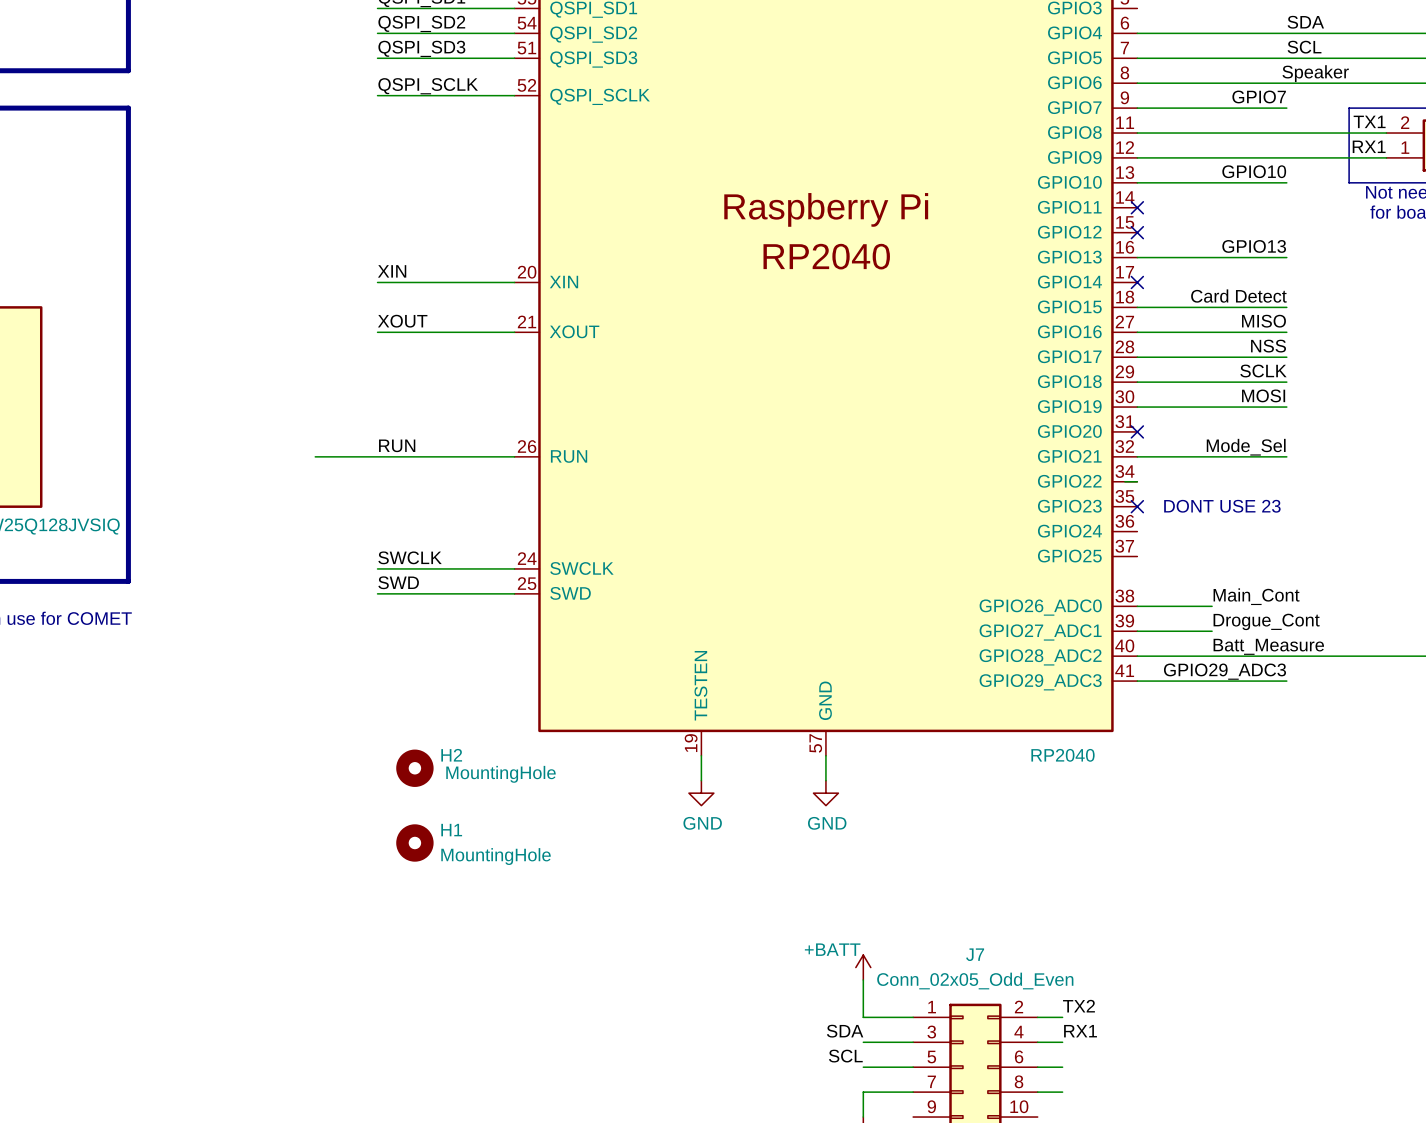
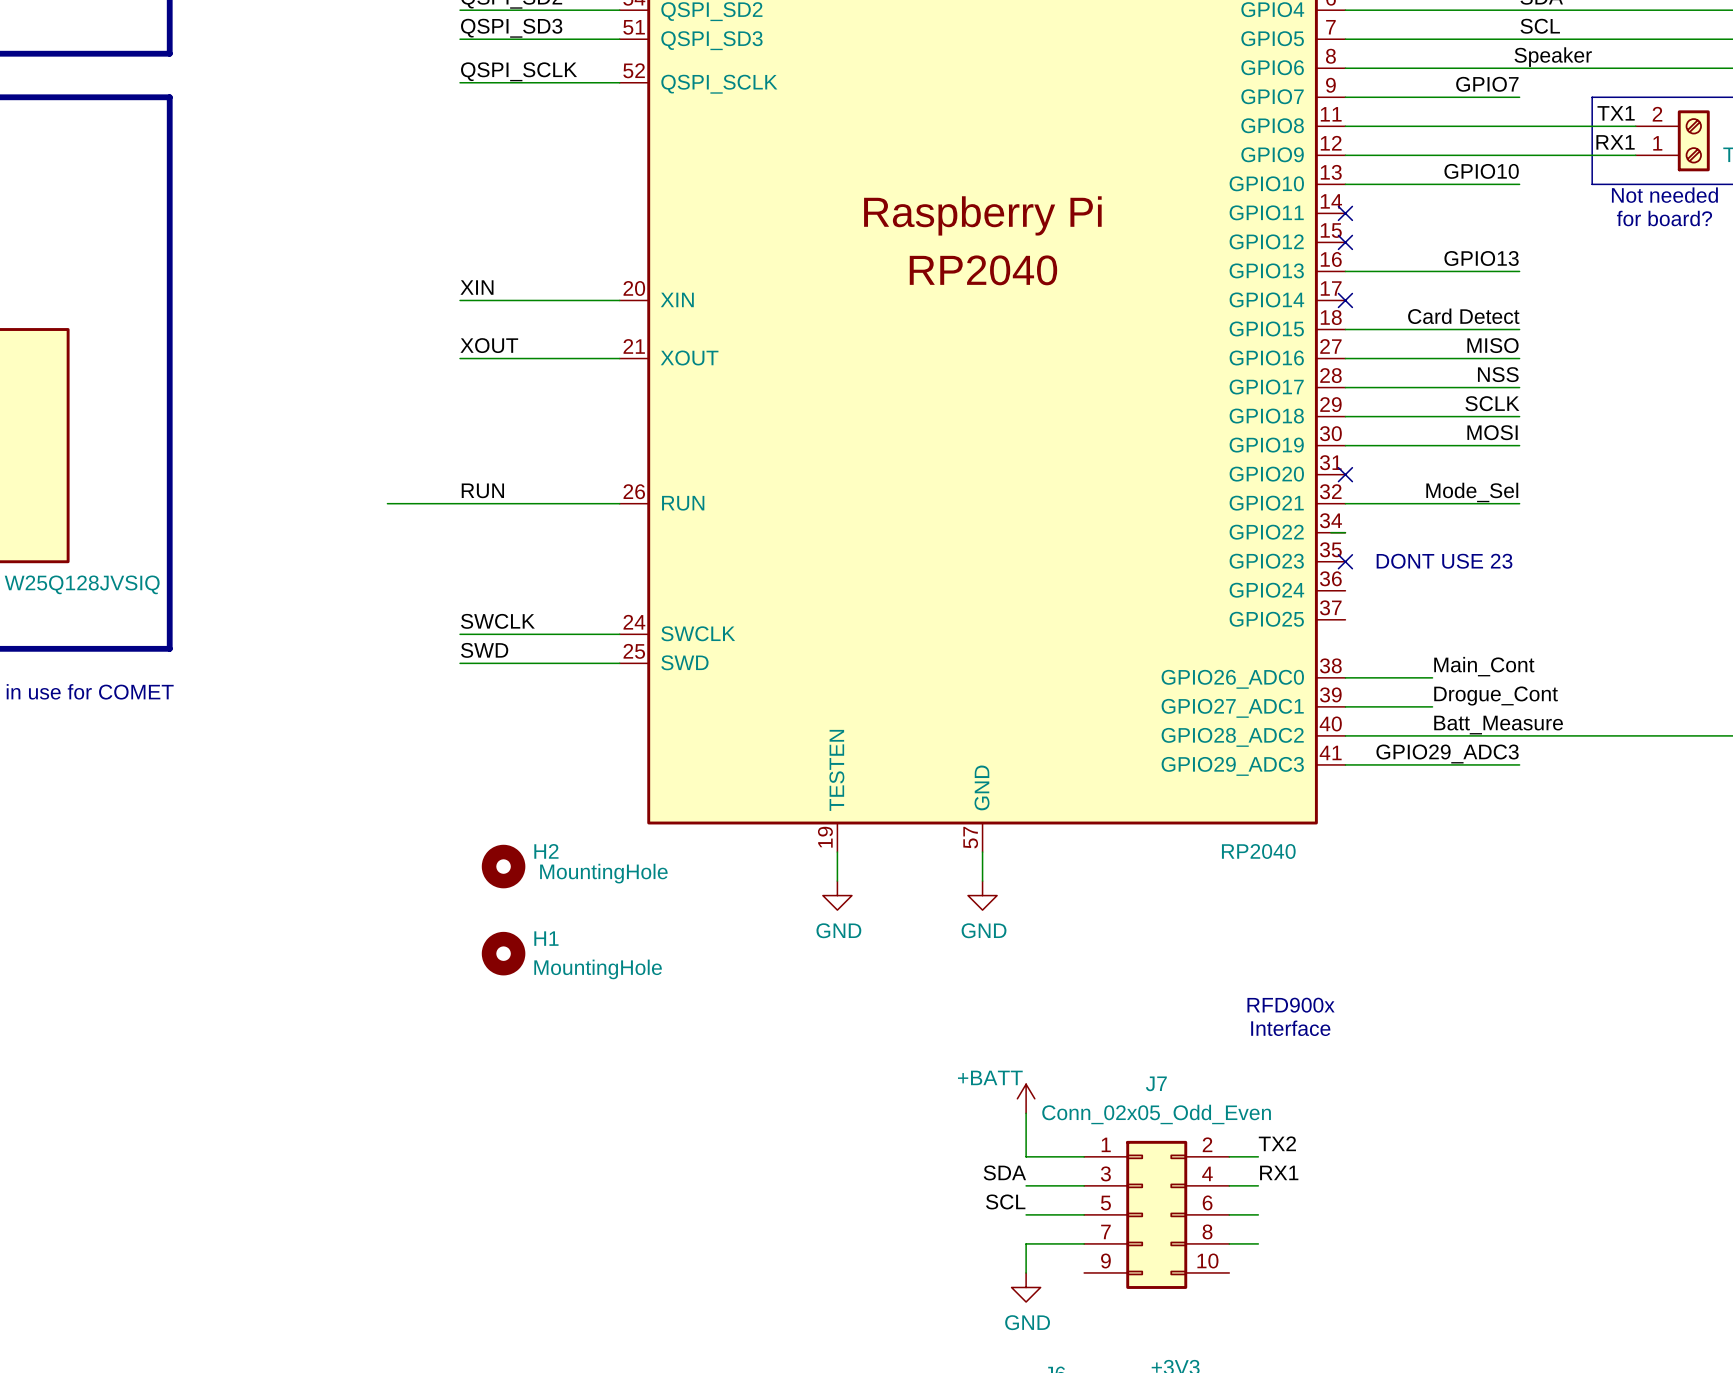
text: none -> RFD900x (1291, 1005)
text: none -> Interface (1290, 1028)

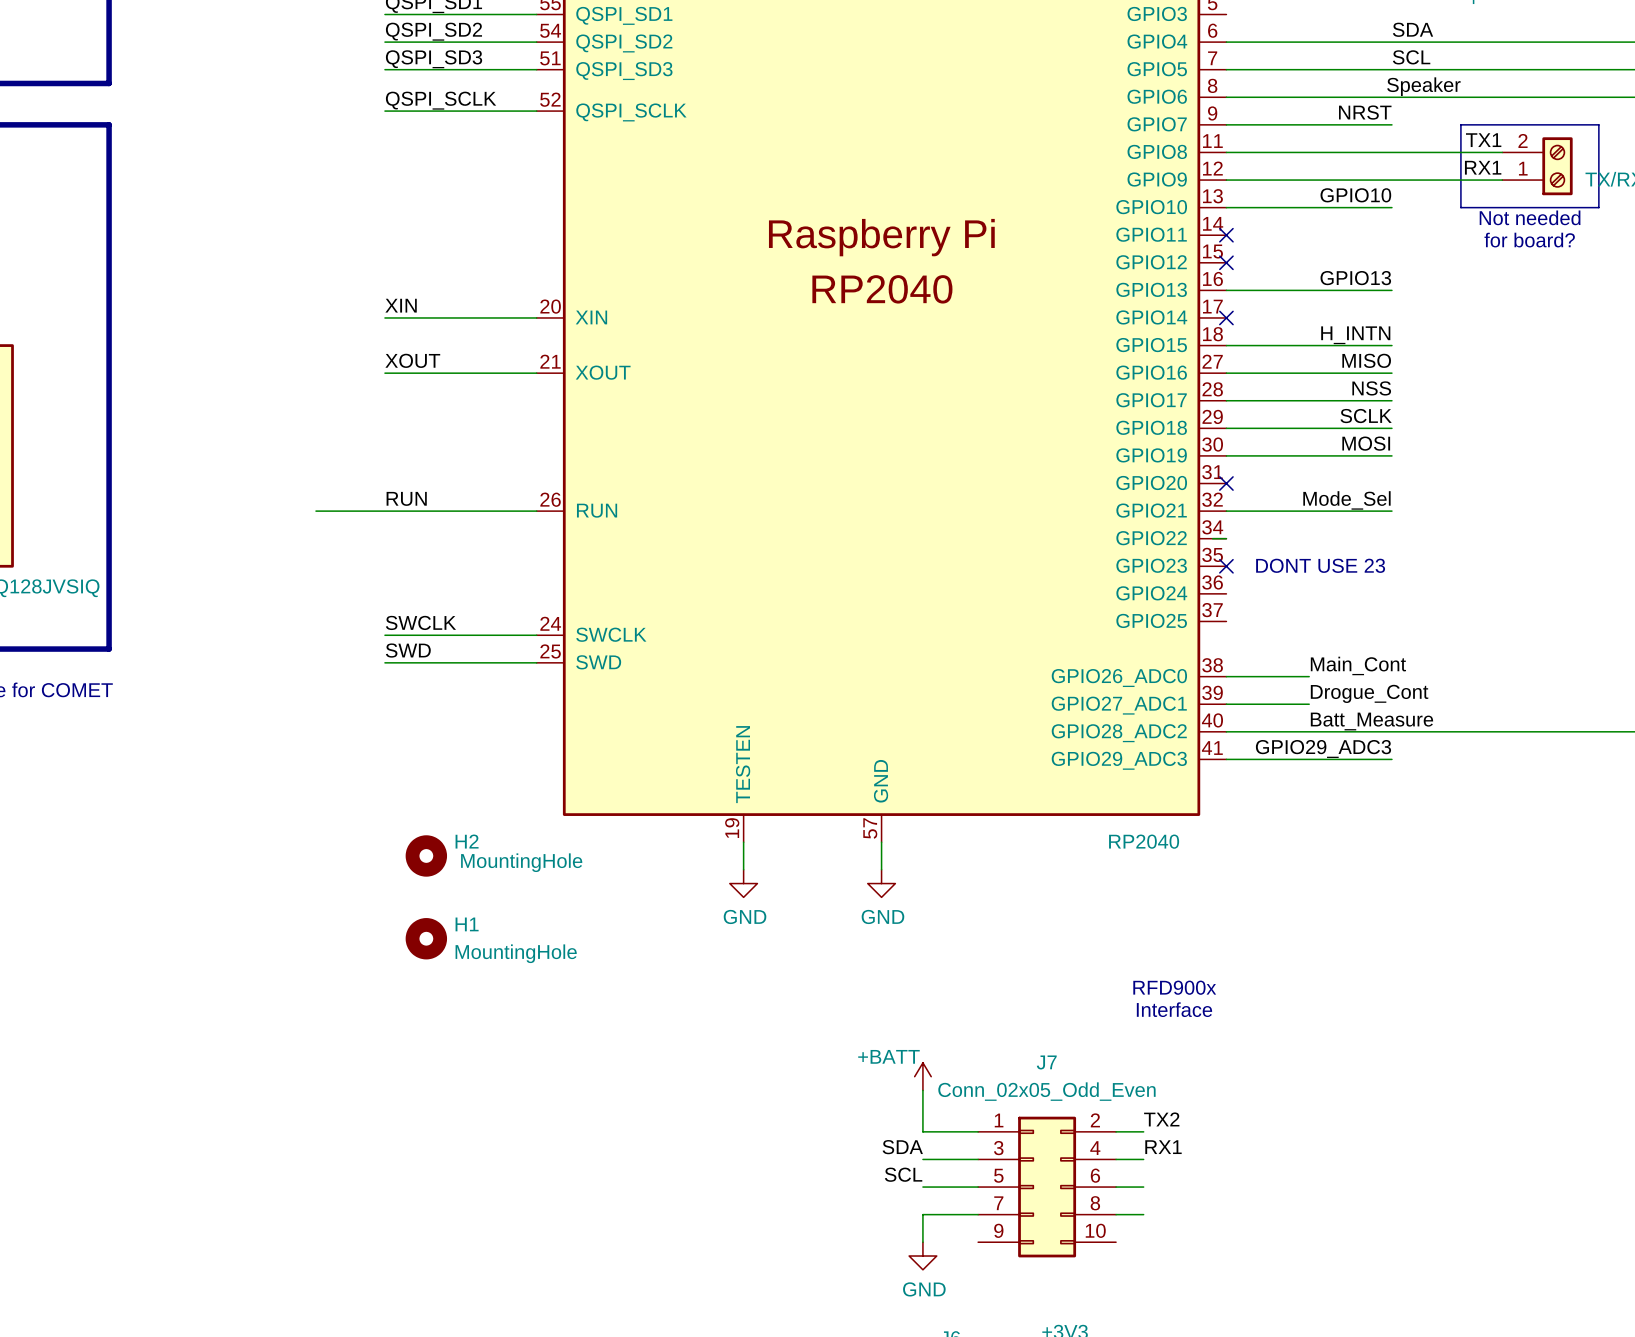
label: GPIO7 (1487, 84) -> NRST (1365, 112)
label: Card Detect (1463, 316) -> H_INTN (1355, 335)

